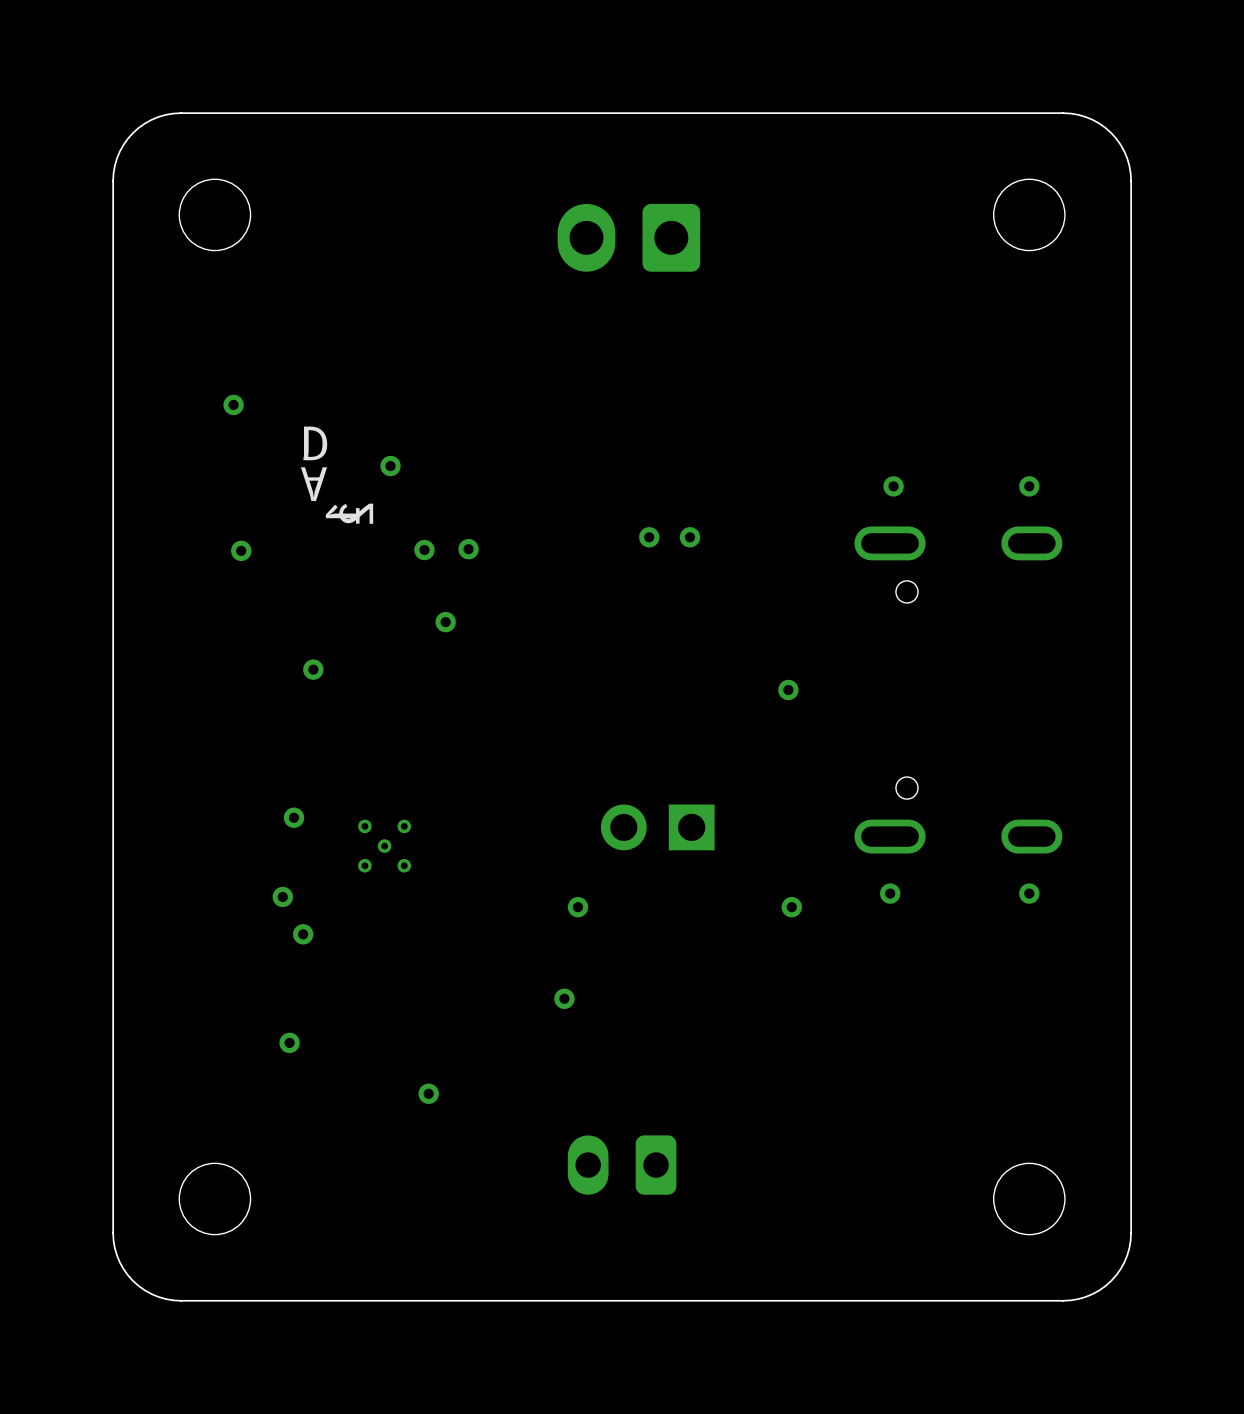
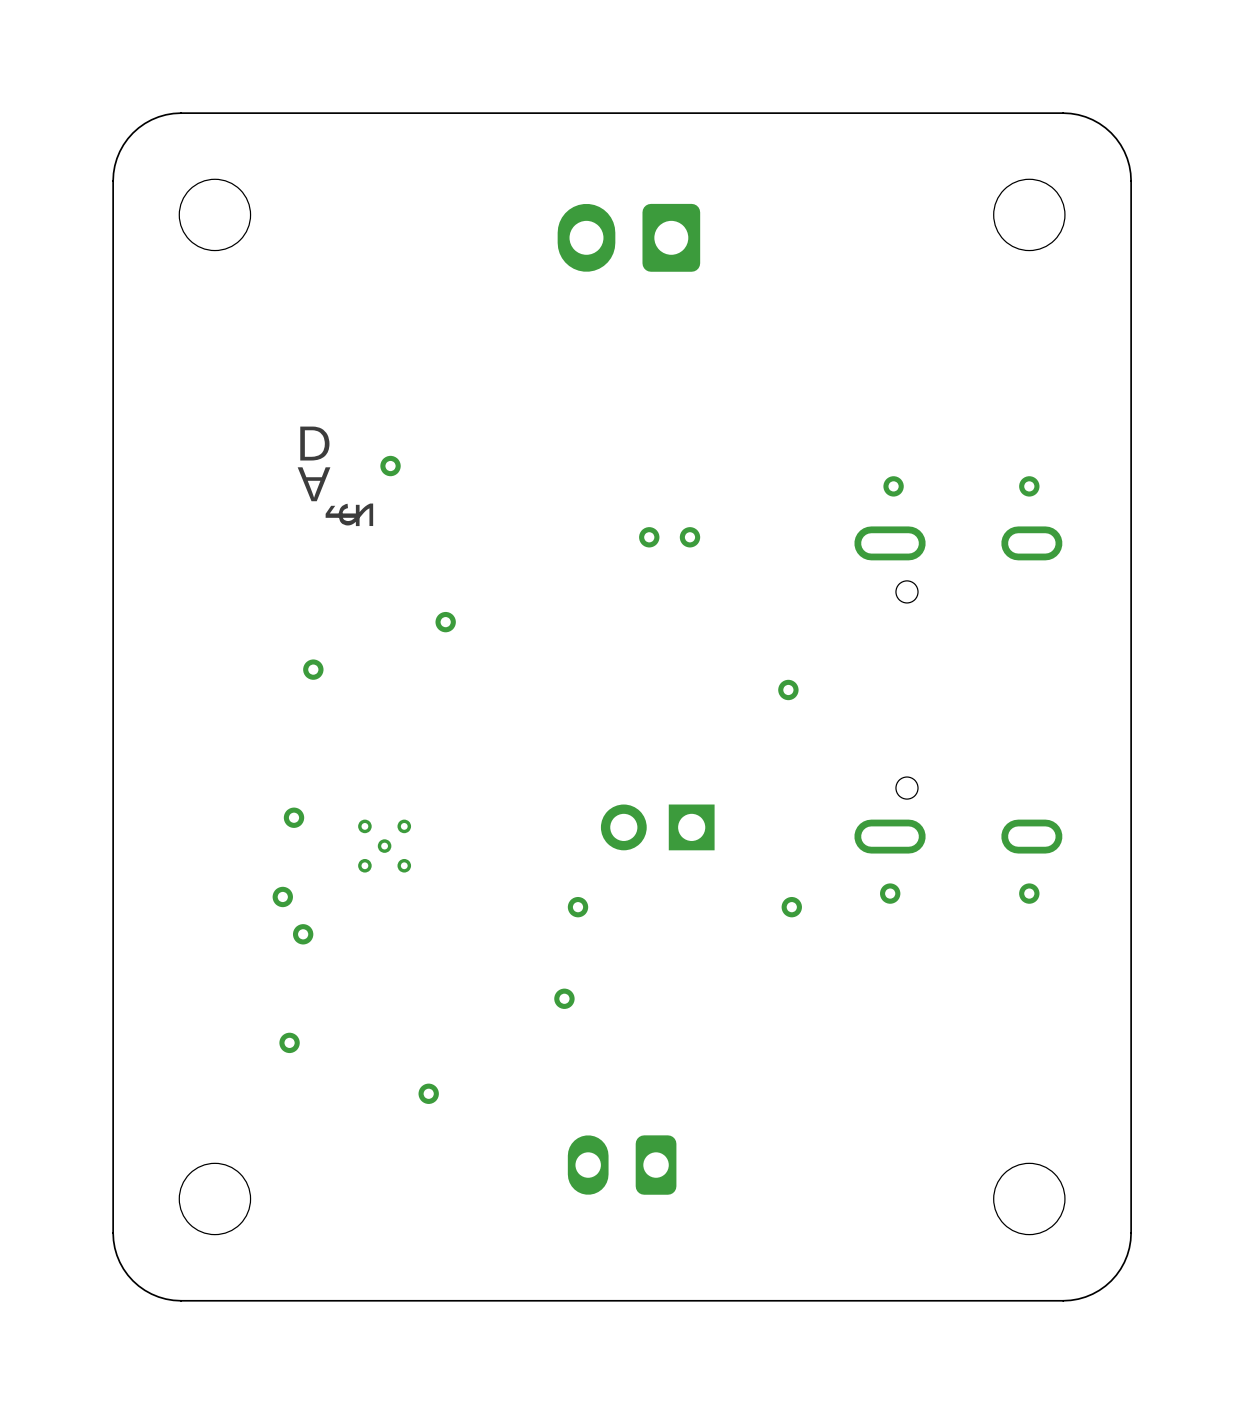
via: (233, 404) -> none
via: (468, 549) -> none
via: (241, 550) -> none
via: (424, 550) -> none

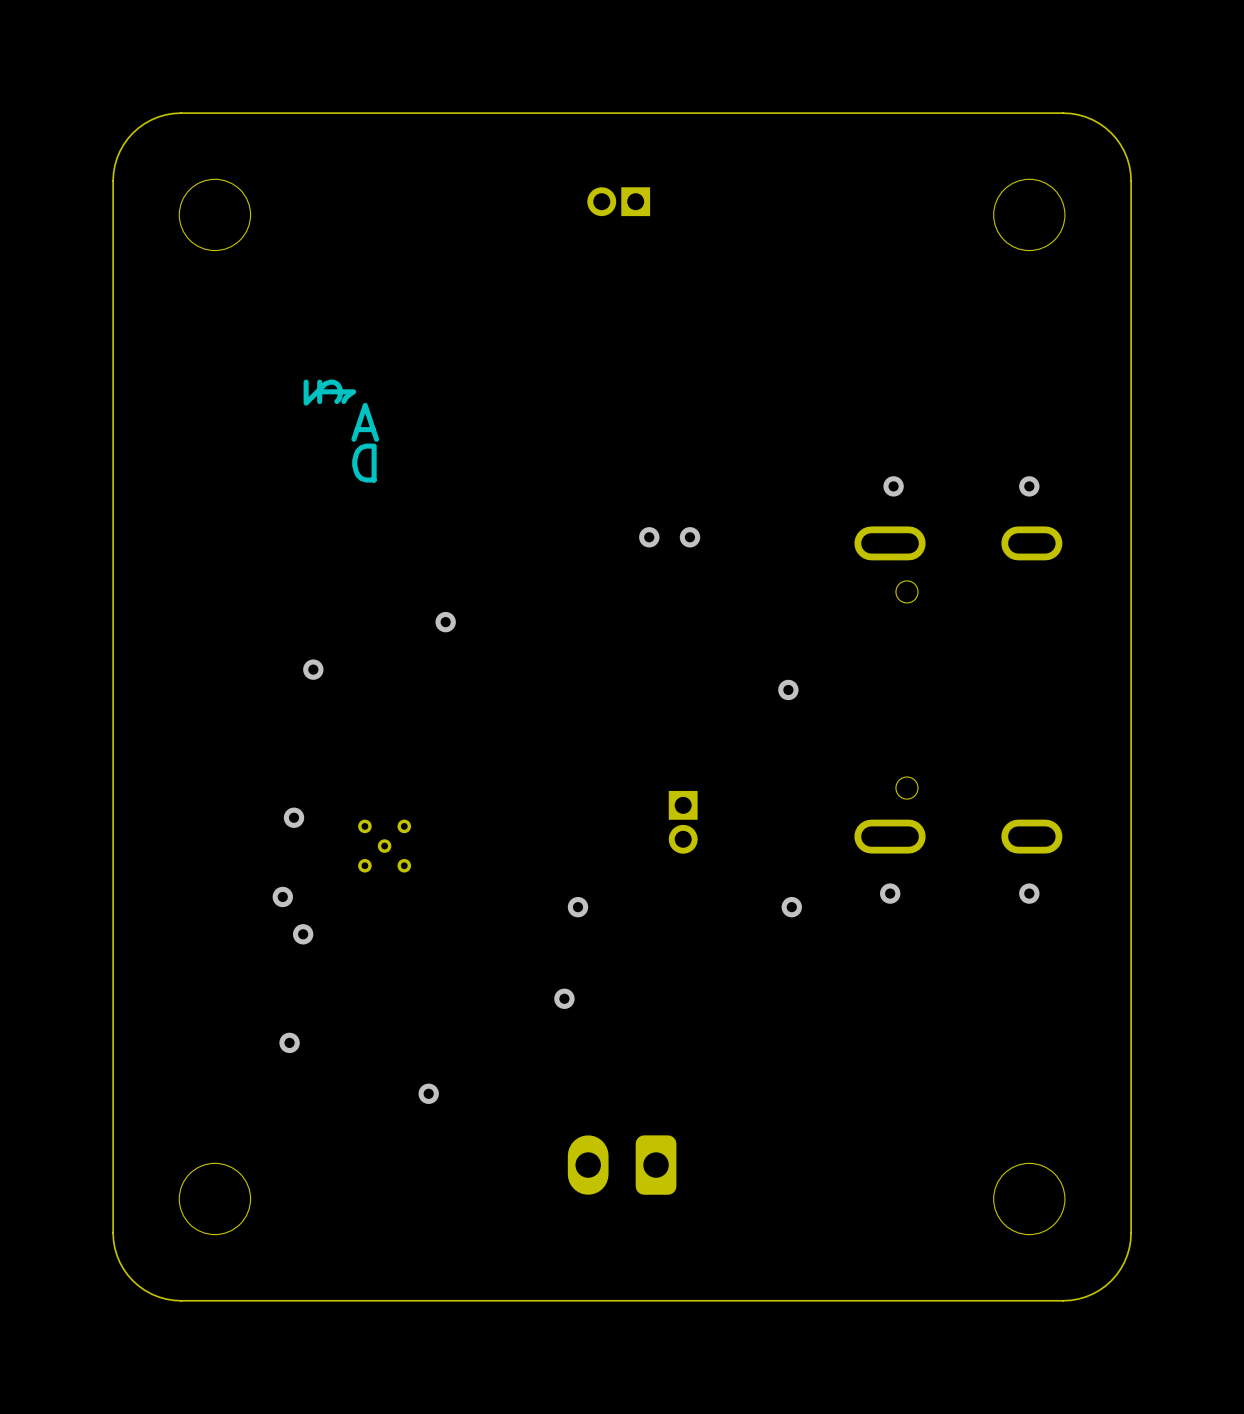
part: none -> (618, 201)
part: (628, 237) -> none
via: (390, 466) -> none
part rotation: 0° (335, 476) -> 180° (341, 431)
part footprint: [600, 804, 715, 851] -> [668, 790, 698, 854]

